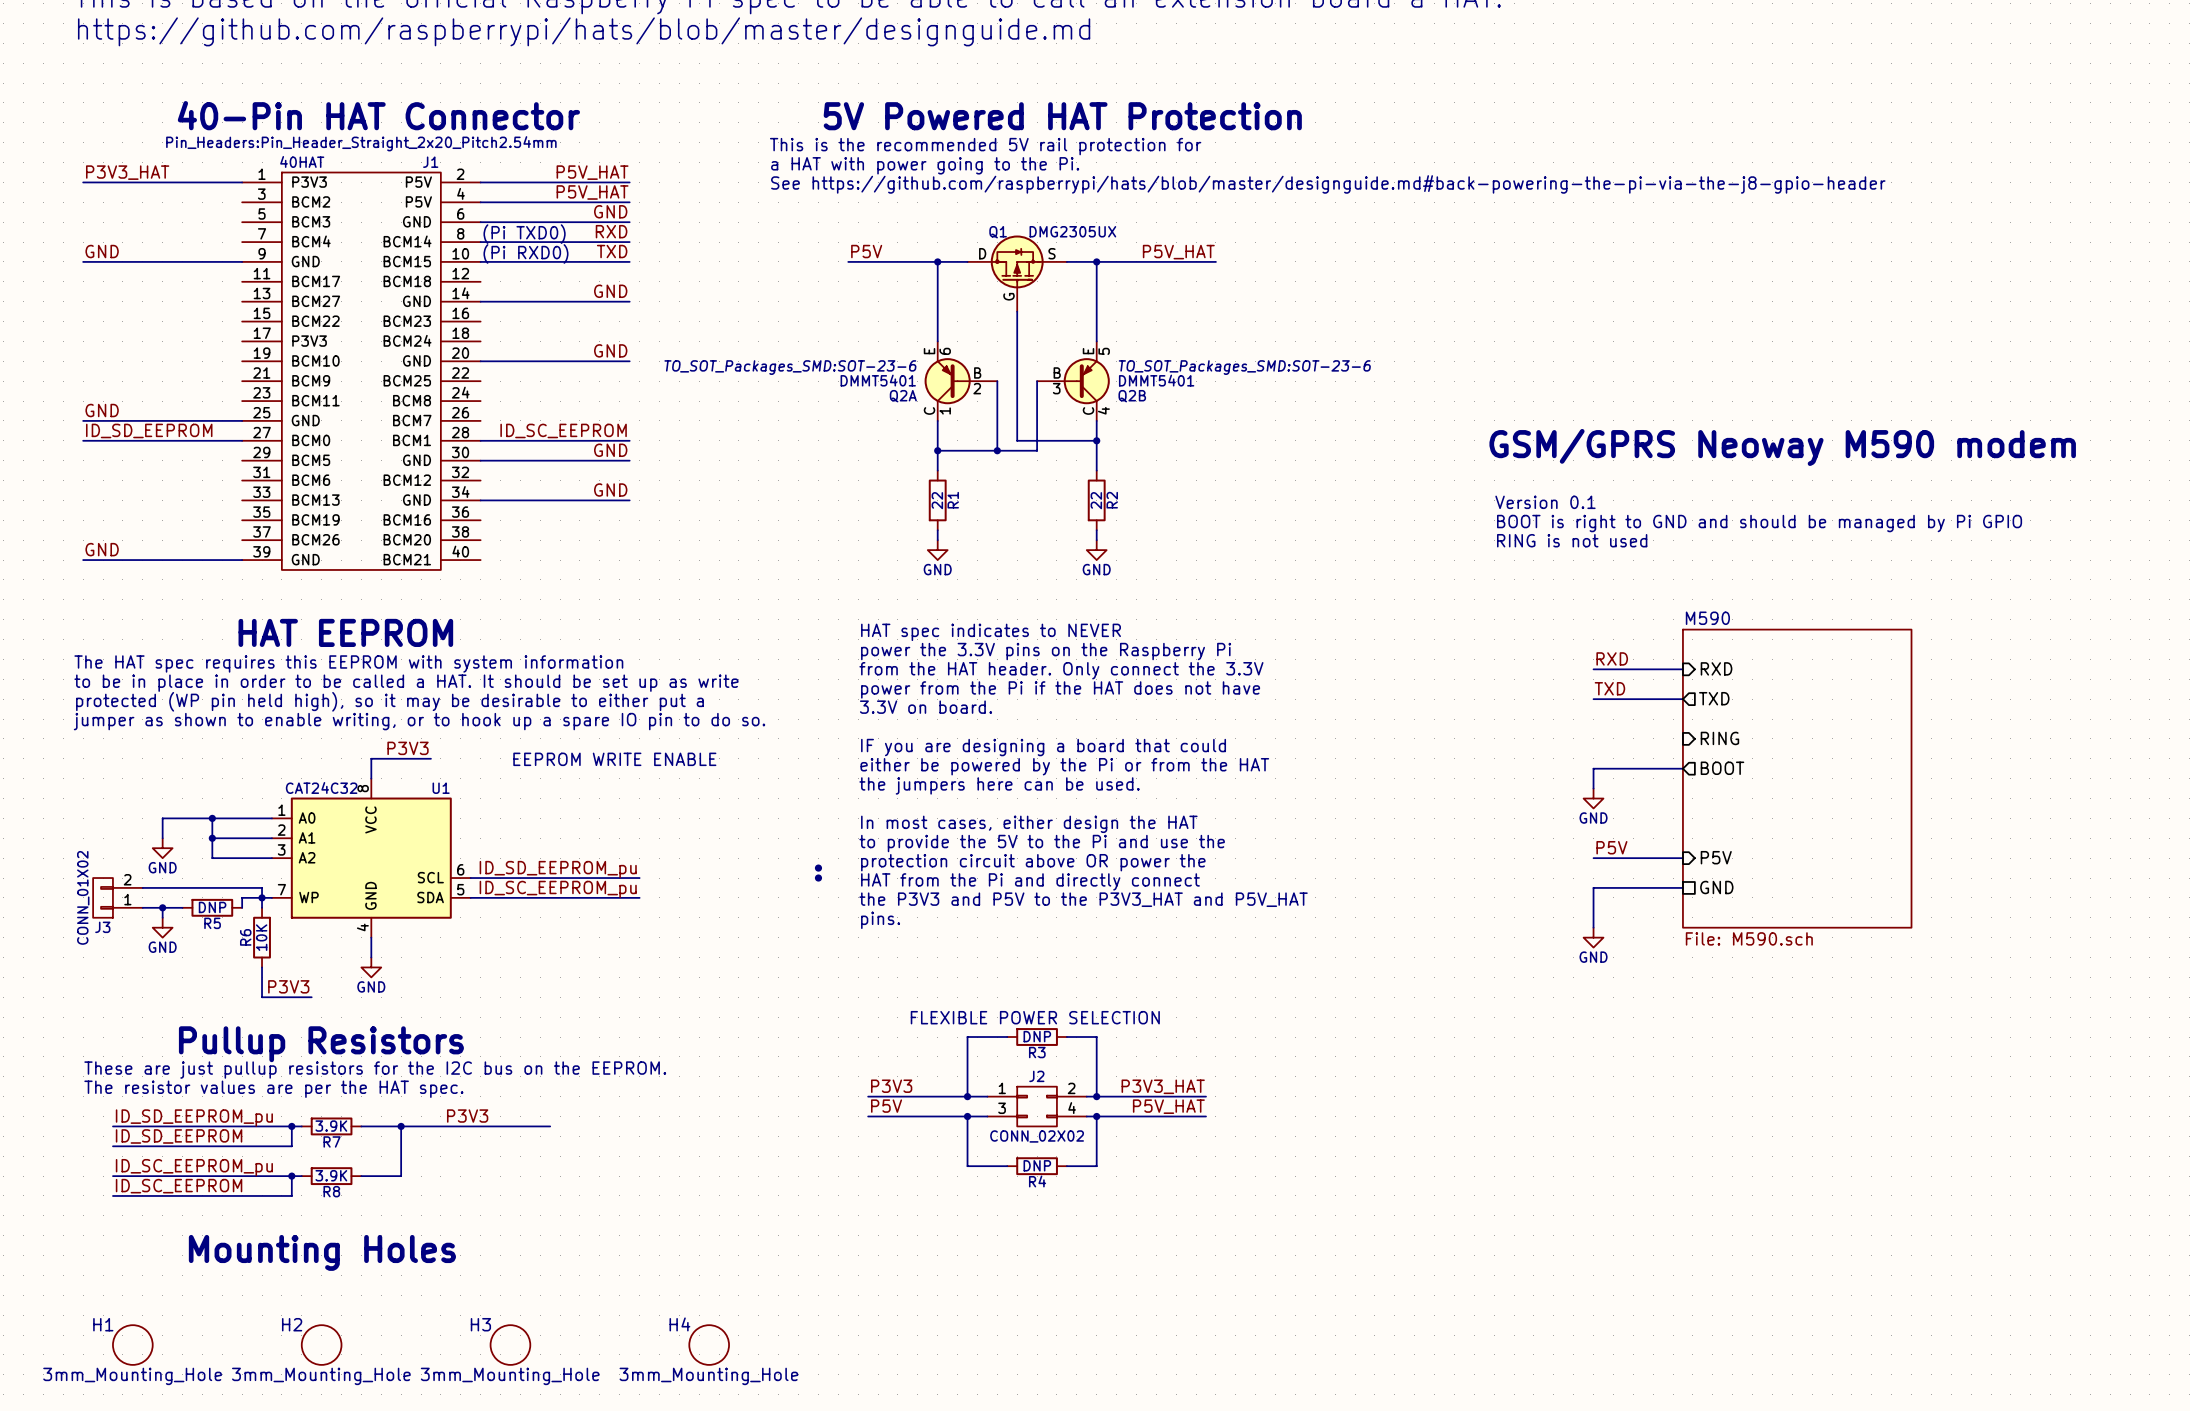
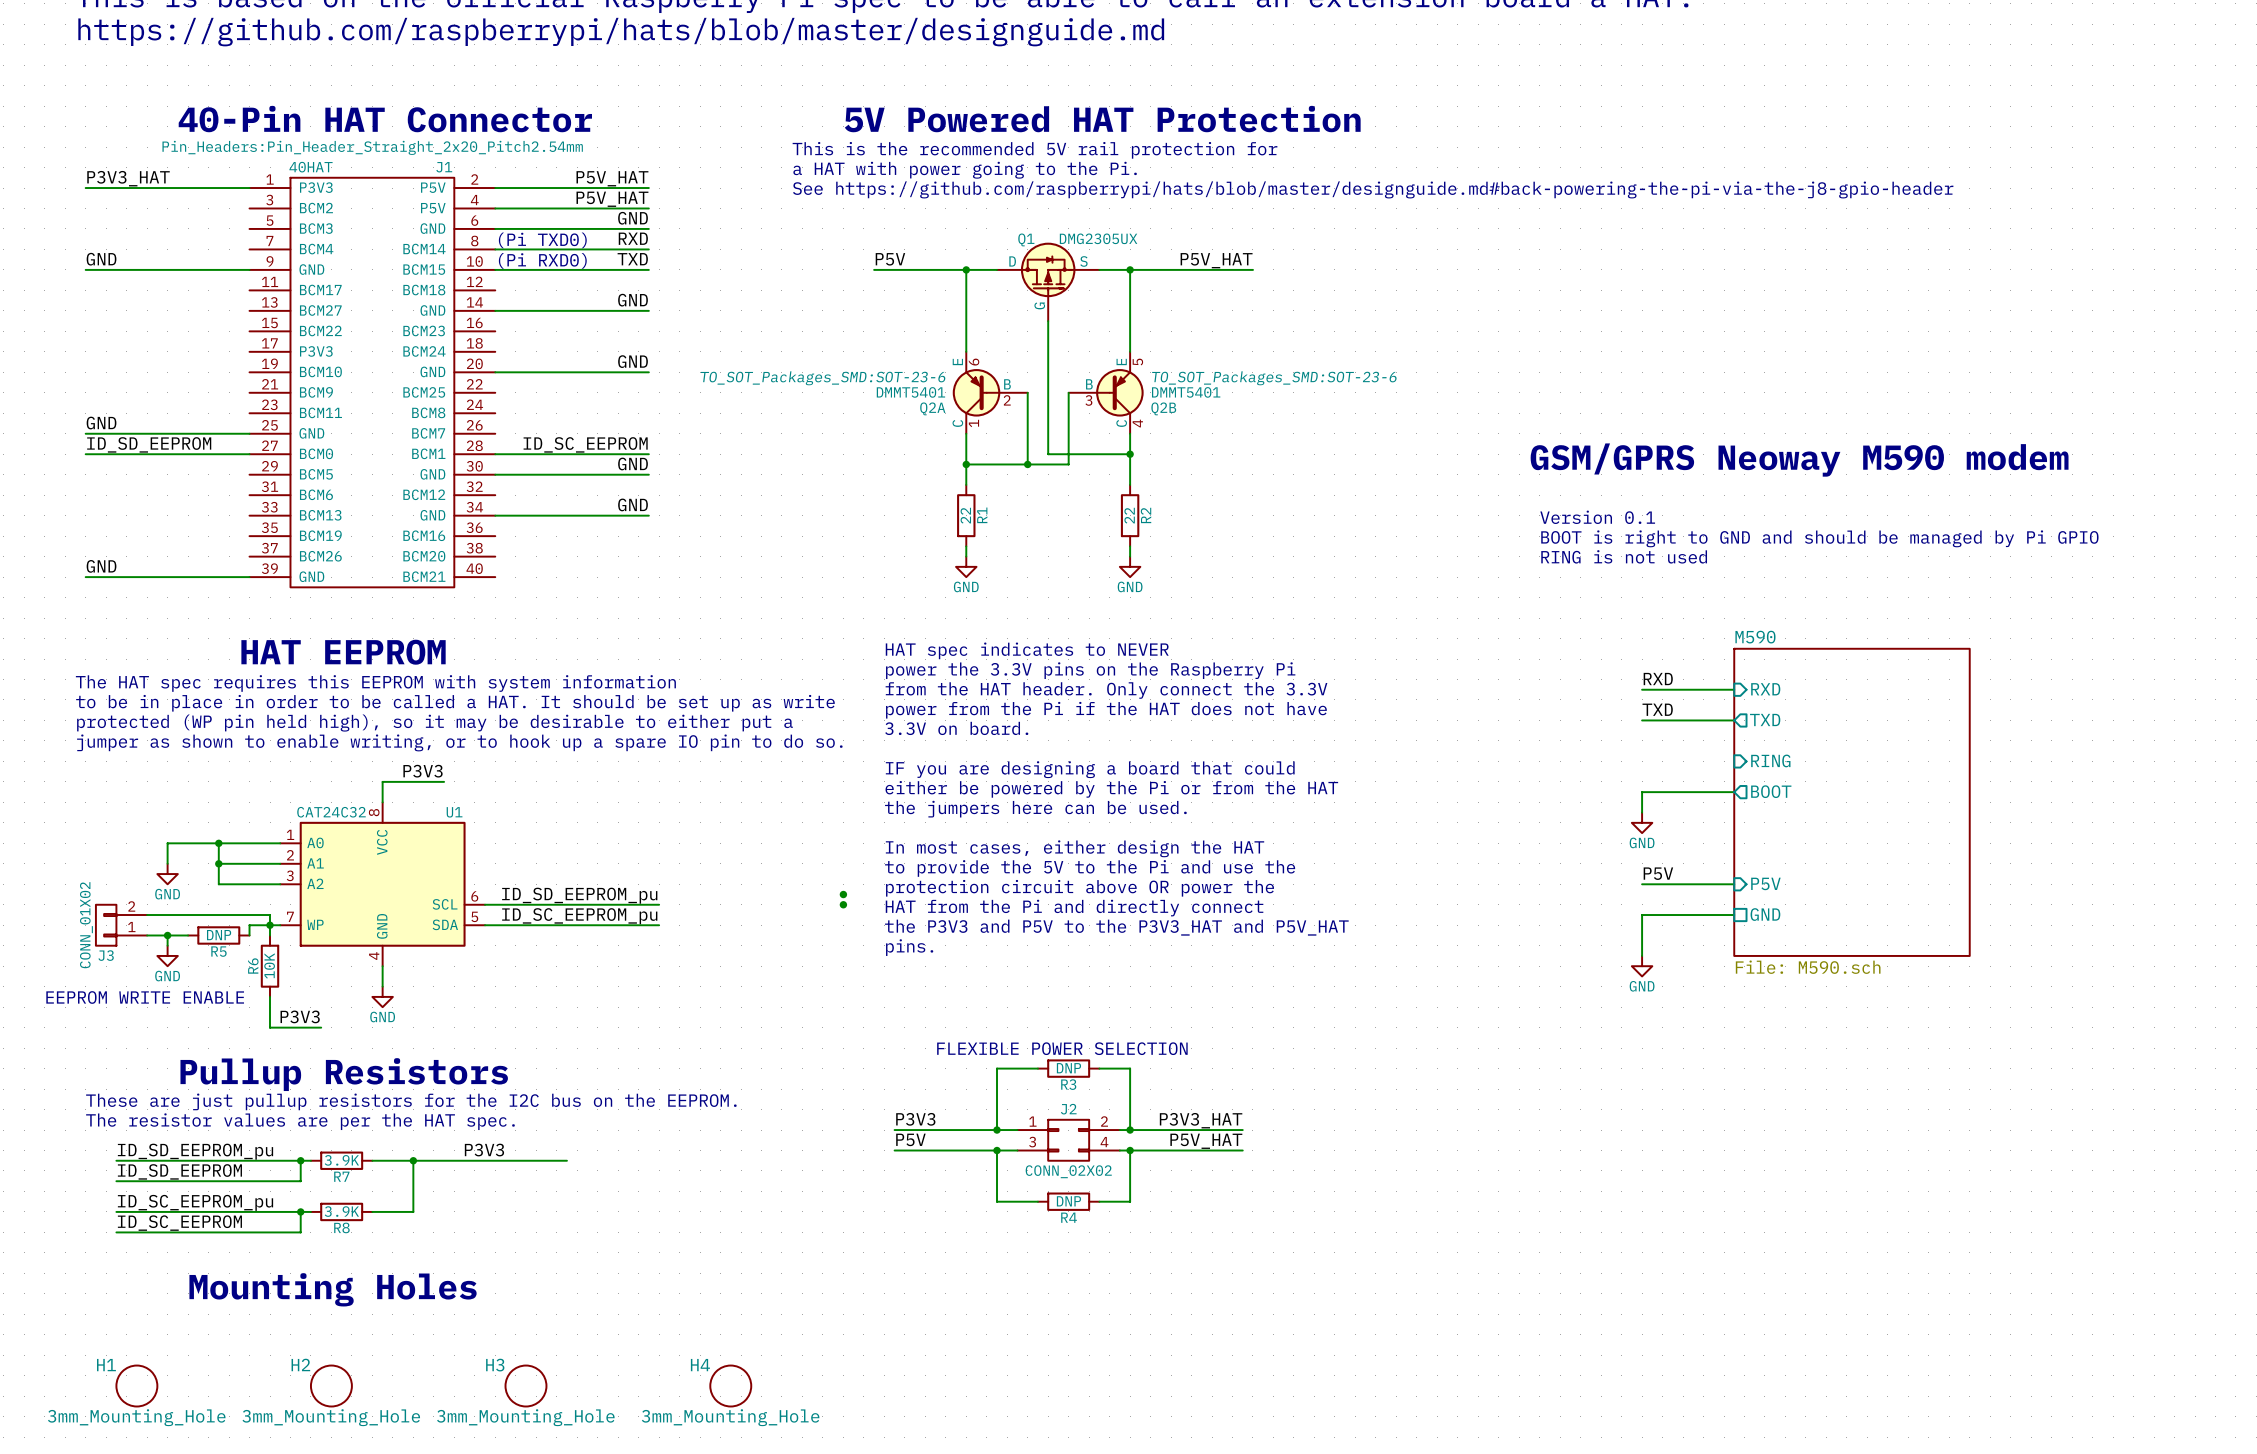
text: EEPROM WRITE ENABLE (614, 759) -> none
text: none -> EEPROM WRITE ENABLE (145, 997)

